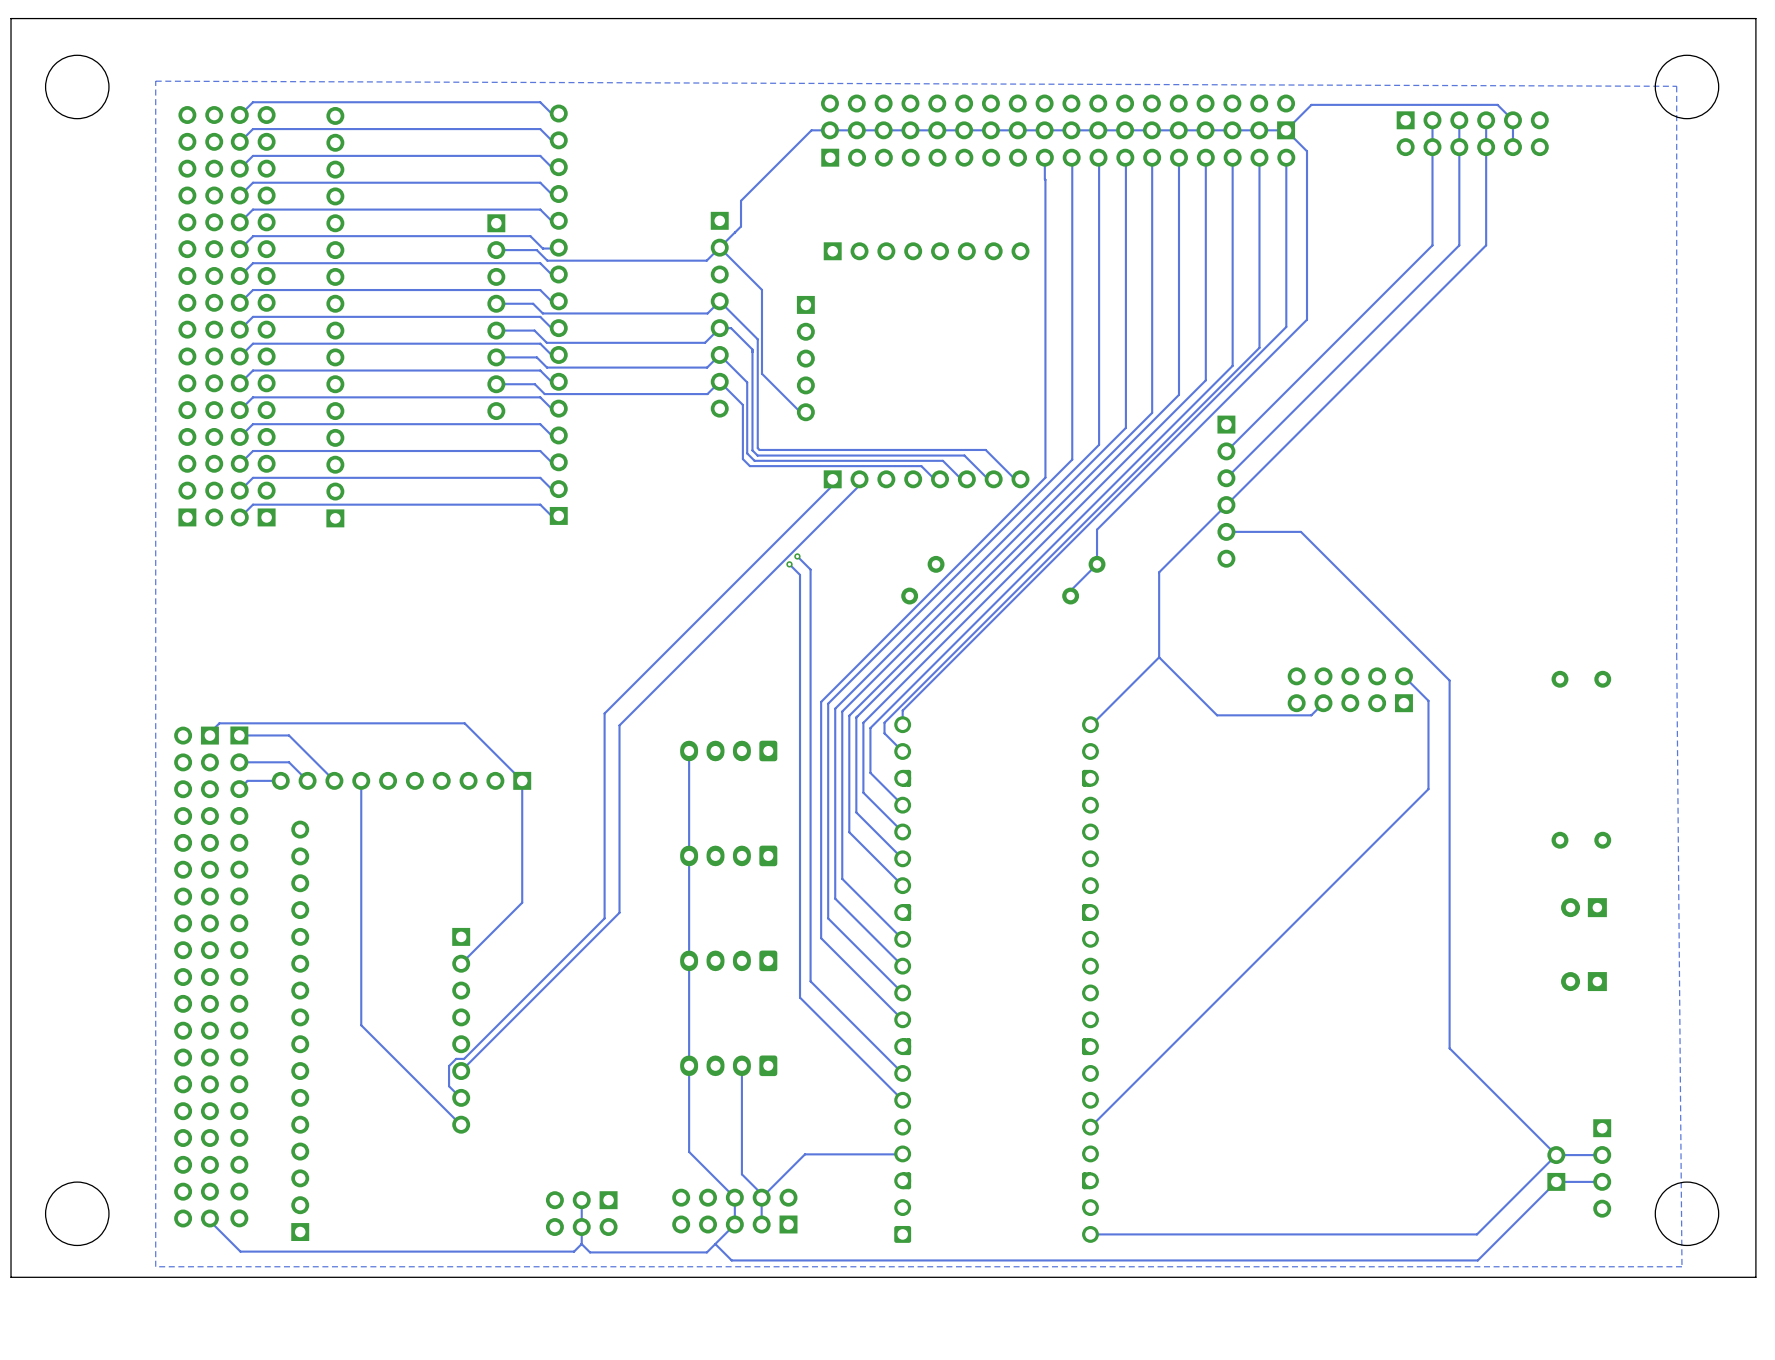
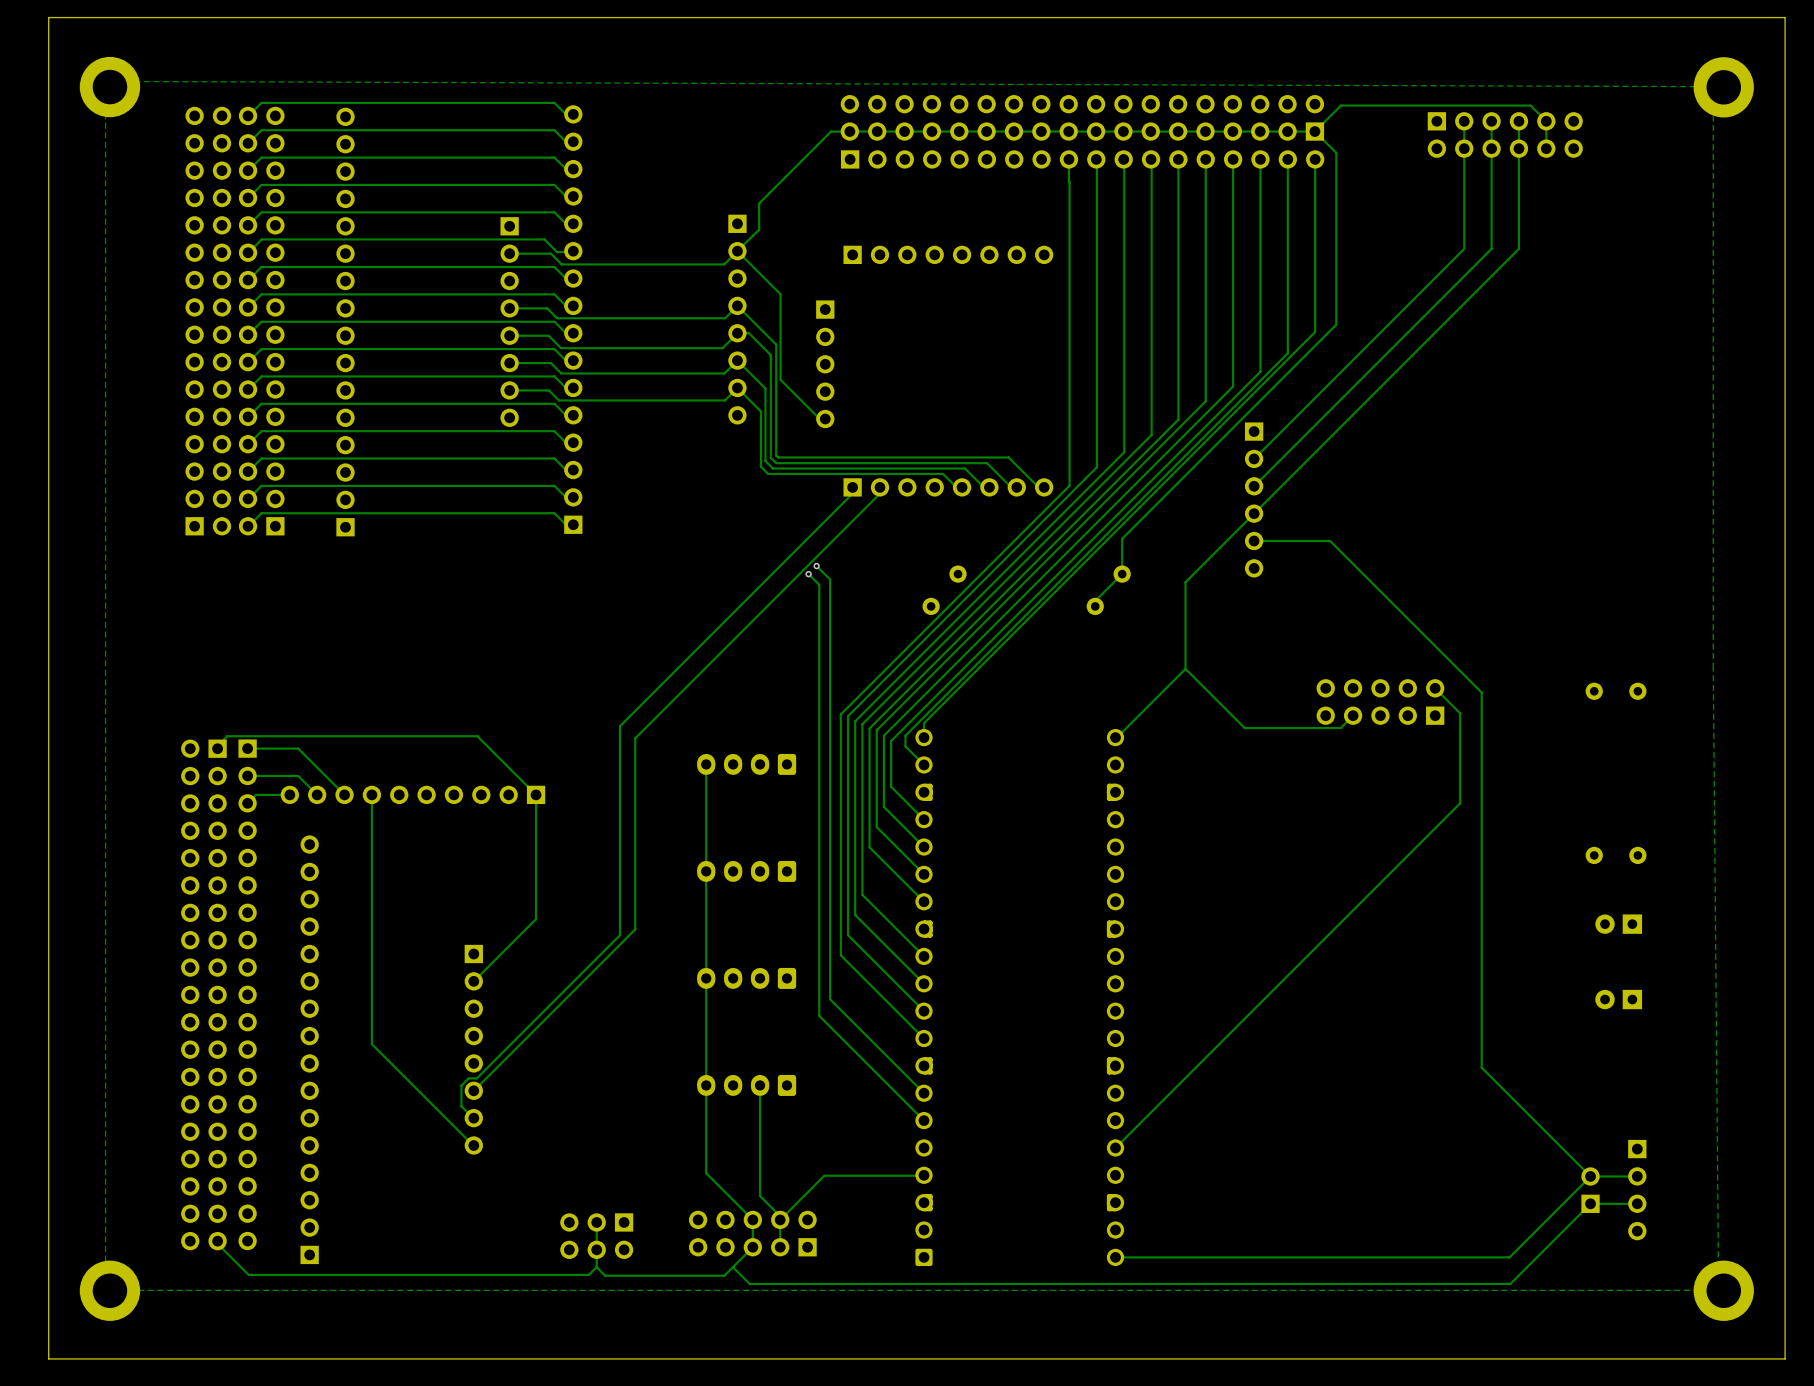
board edge: (1747, 18) (1755, 18) (1755, 1277) (11, 1277) (11, 18) (44, 18) -> (1785, 17) (1785, 1358) (48, 1358) (48, 17)
round board edge: [45, 54, 110, 120] -> none
round board edge: [1654, 54, 1720, 120] -> none
part: none -> (109, 87)
zone outline: (1676, 86) (155, 81) (155, 1266) -> (1713, 86) (105, 81) (105, 1290) (162, 1290)
part: none -> (1723, 87)
round board edge: [45, 1181, 110, 1246] -> none
round board edge: [1654, 1181, 1720, 1246] -> none
part: none -> (109, 1290)
part: none -> (1723, 1290)

